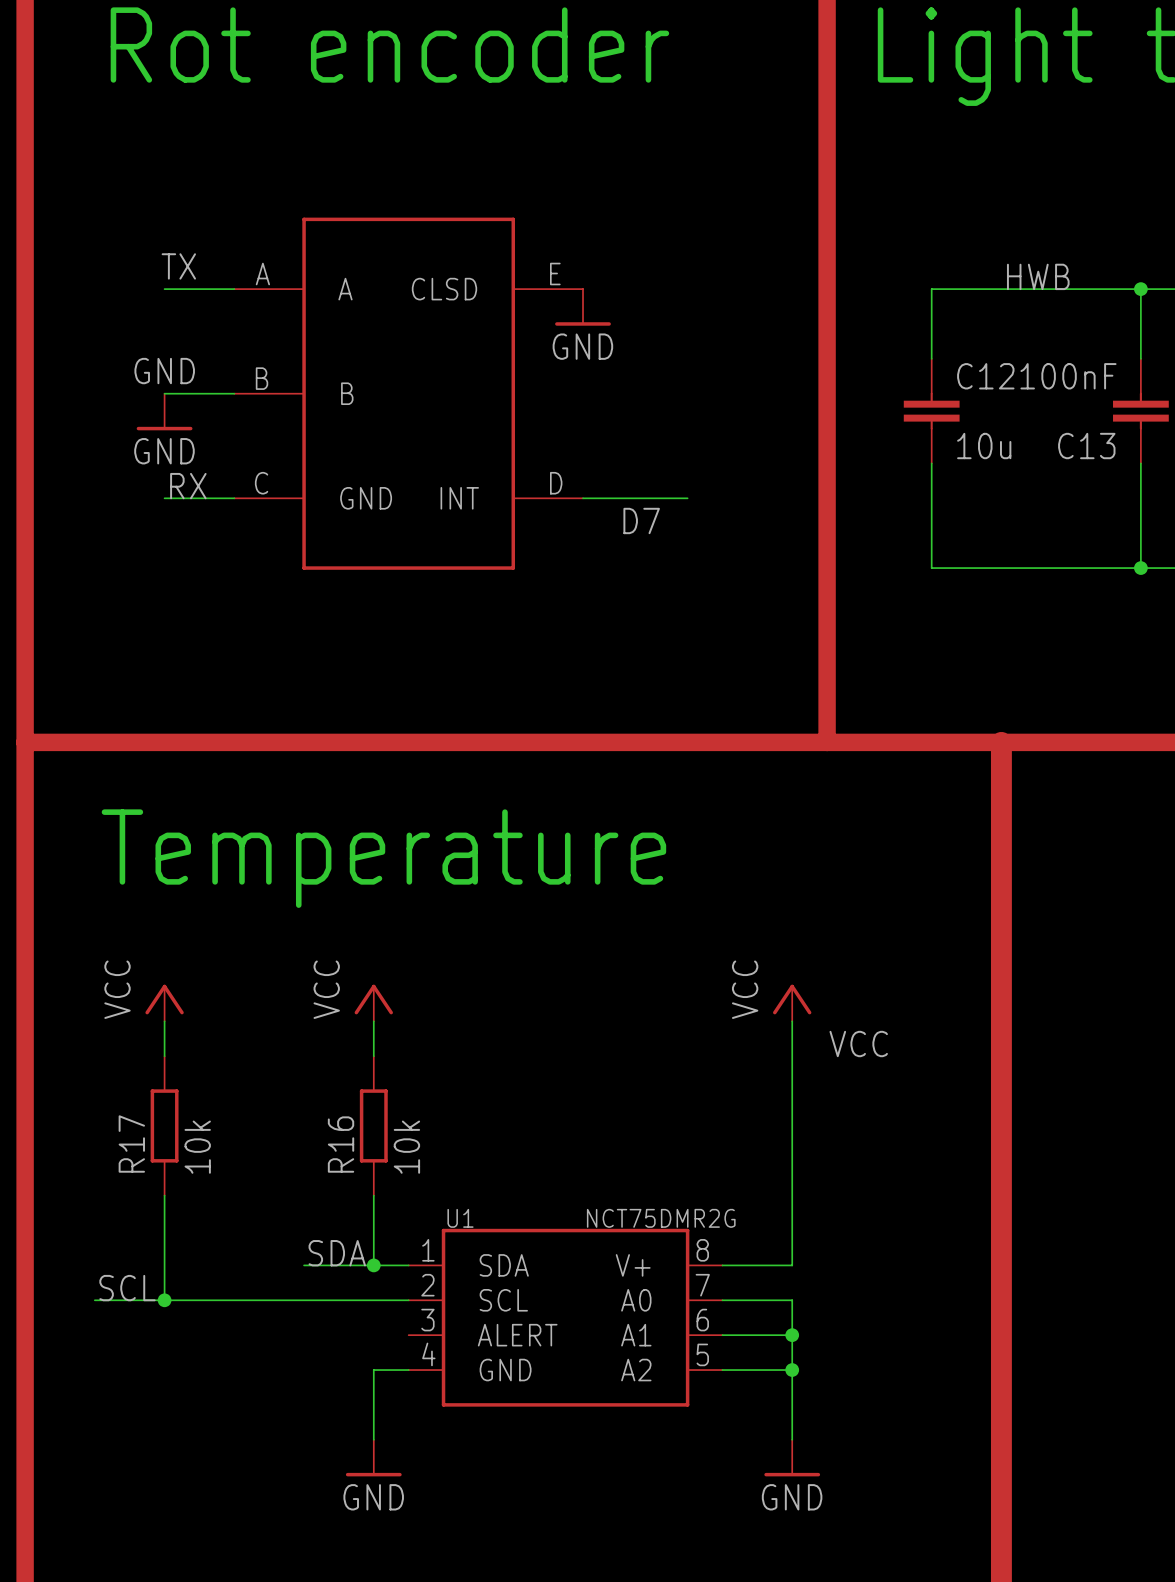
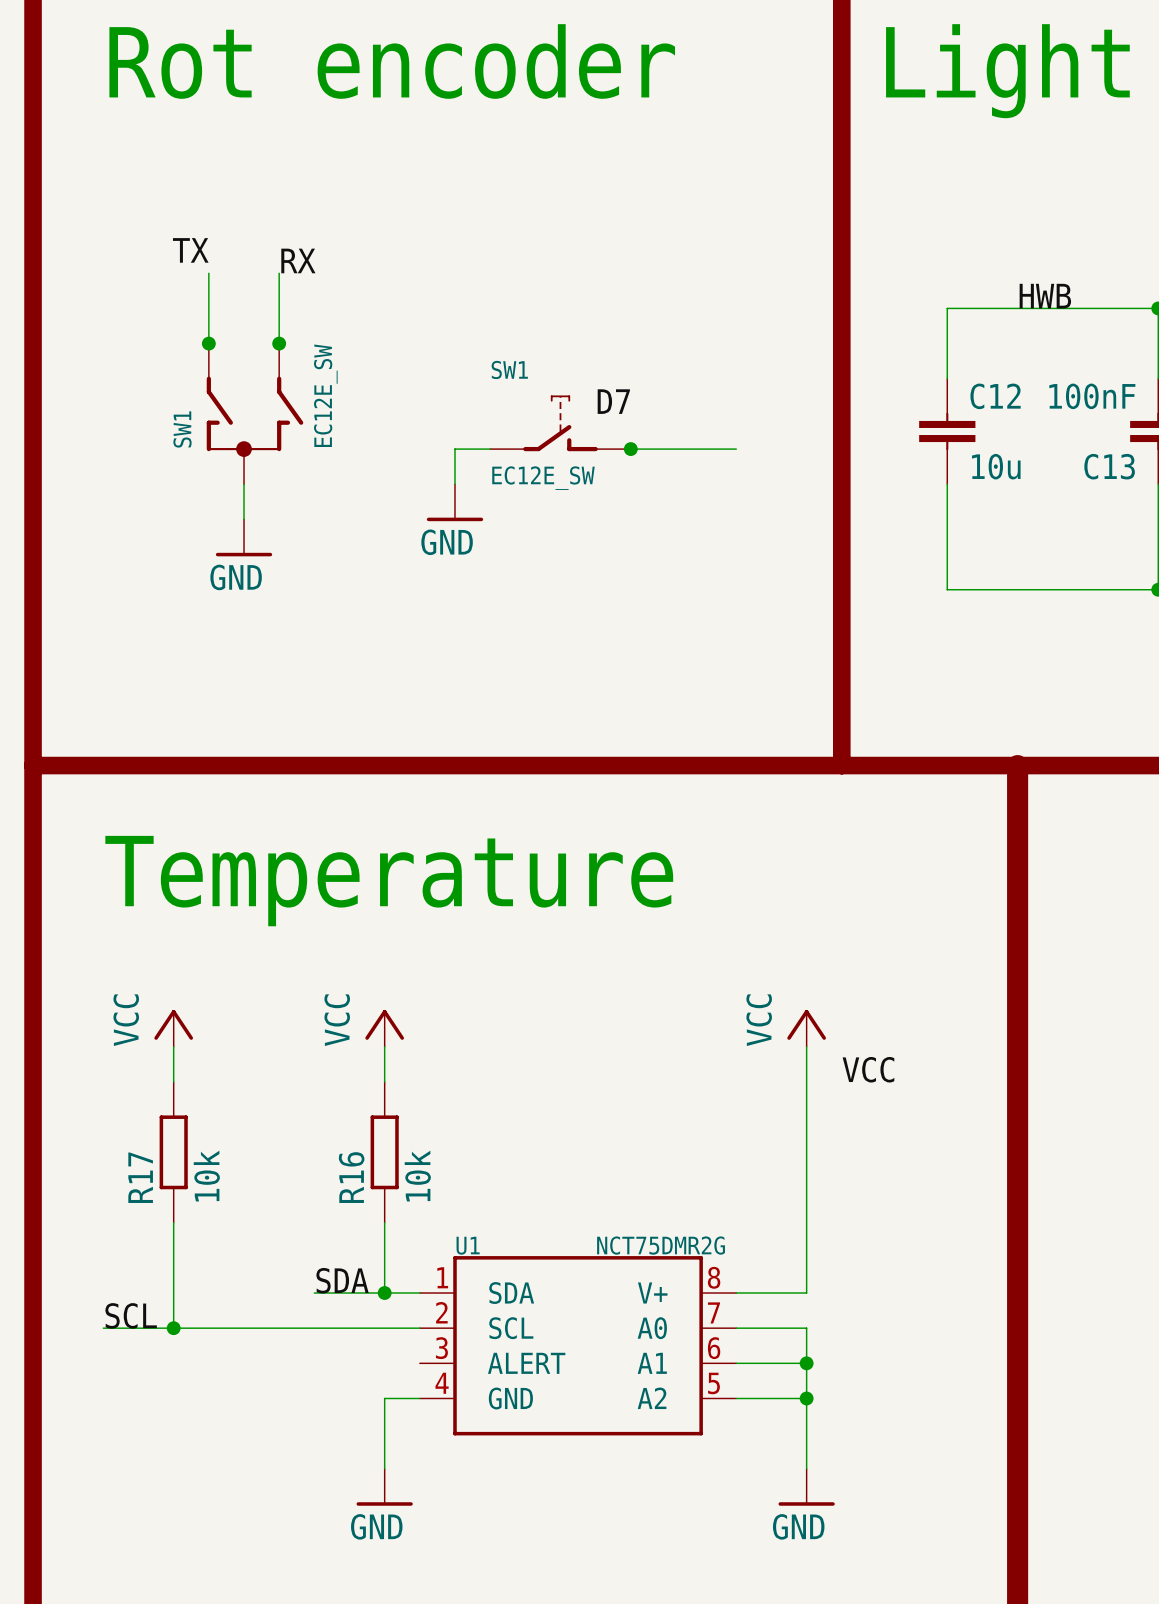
wire: none -> (208, 273) (208, 343)
wire: none -> (279, 273) (279, 343)
label position: TX (178, 266) -> TX (190, 250)
wire: (164, 289) (234, 289) -> none
power symbol: GND (583, 307) -> none
junction: none -> (208, 343)
junction: none -> (279, 343)
label: GND (164, 371) -> none
wire: (164, 393) (234, 393) -> none
SW1: none -> EC12E_SW (255, 413)
part: (408, 393) -> none
SW1: none -> EC12E_SW (560, 423)
power symbol position: GND (164, 412) -> GND (244, 537)
wire: none -> (490, 449) (454, 449) (454, 484)
junction: none -> (630, 449)
power symbol: none -> GND (454, 502)
label position: RX (188, 486) -> RX (298, 260)
wire: (164, 498) (234, 498) -> (244, 484) (244, 519)
wire: (583, 498) (687, 498) -> (630, 449) (736, 449)
label position: D7 (641, 520) -> D7 (613, 401)

